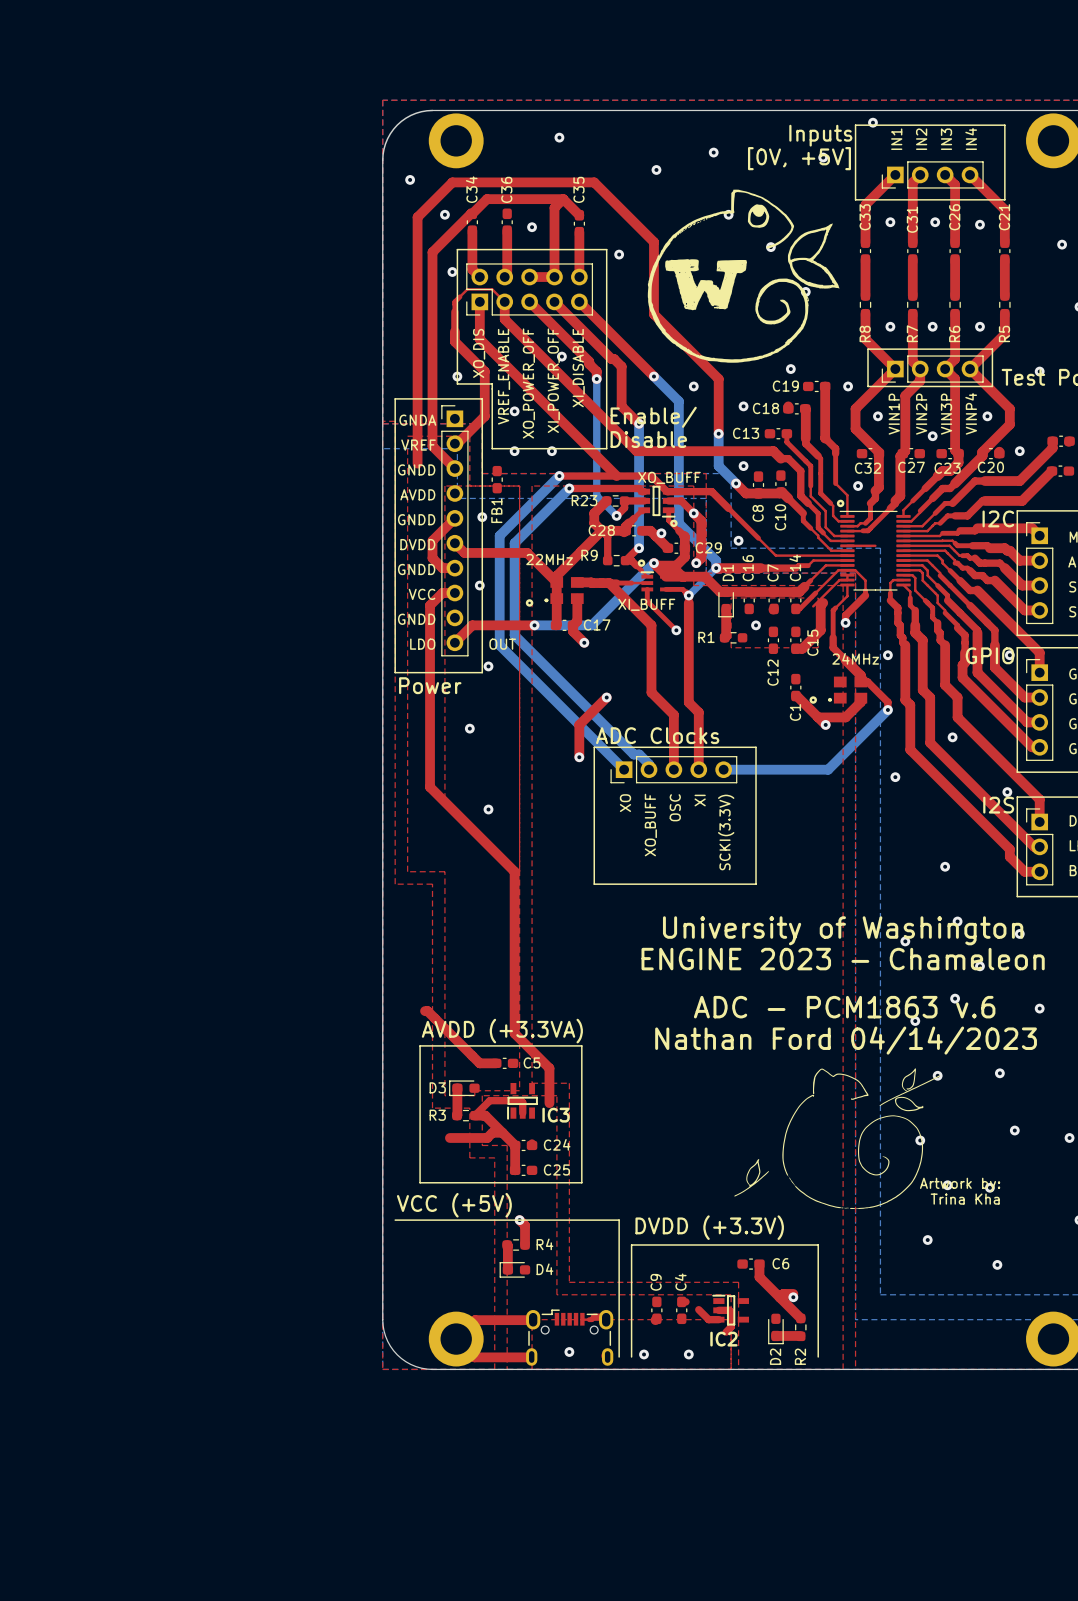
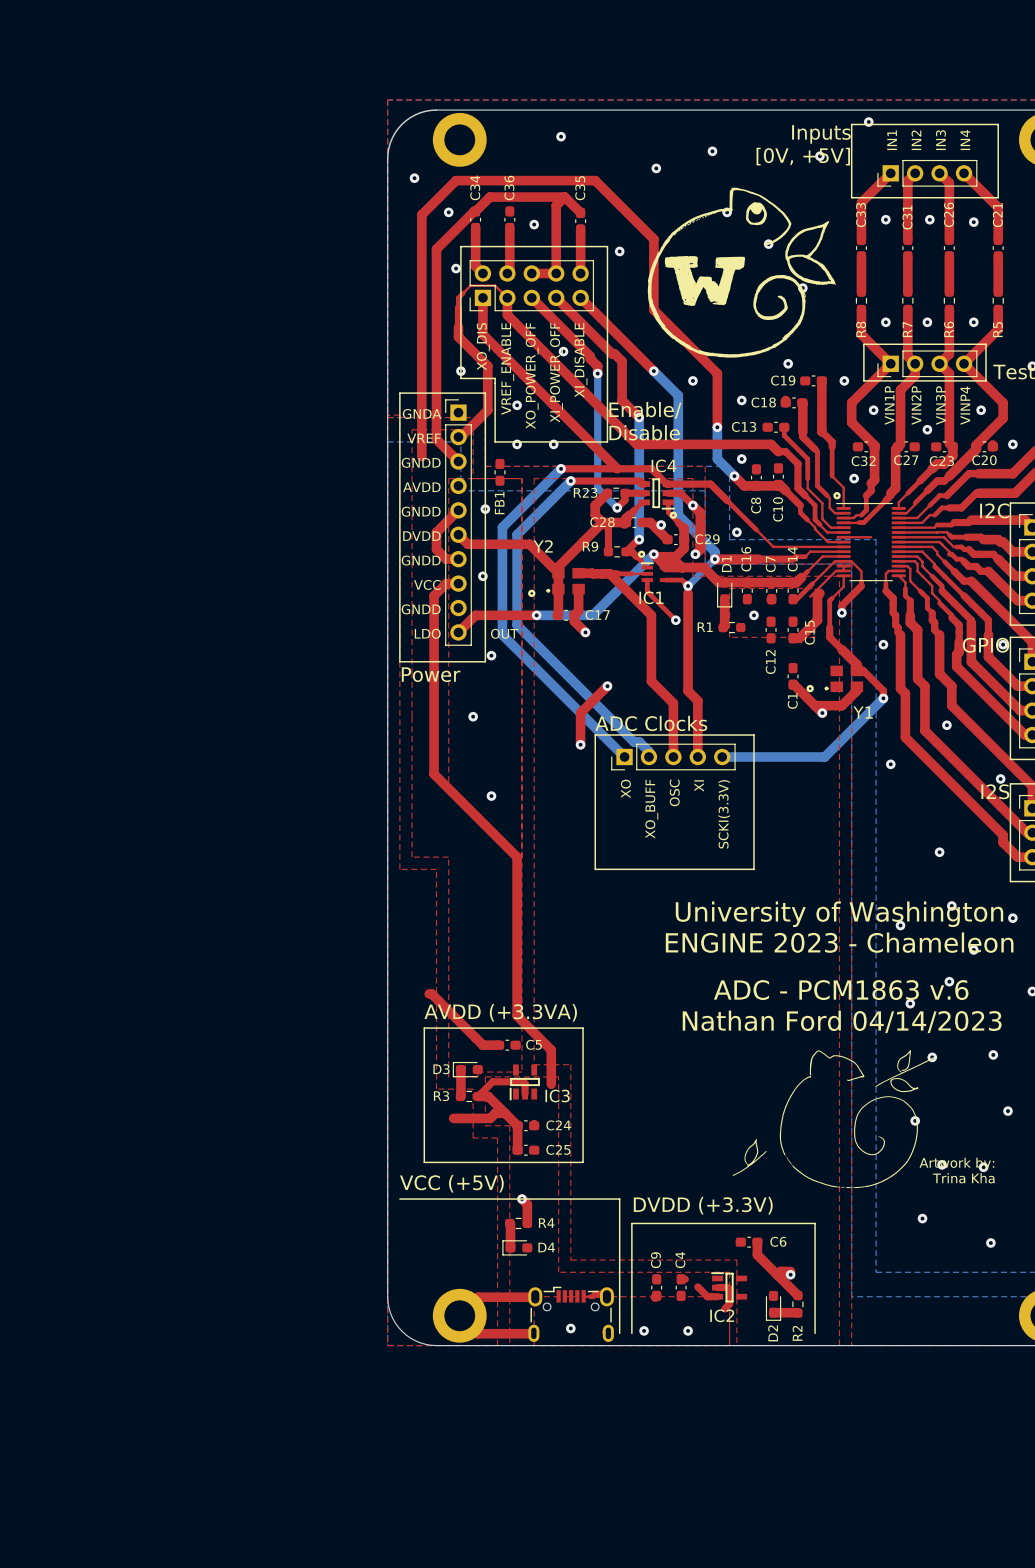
IC4 name: none -> IC4 (663, 465)
text: XO_BUFF (669, 477) -> none
Y2 name: none -> Y2 (543, 546)
text: 22MHz (549, 559) -> none
text: XI_BUFF (646, 604) -> none
IC1 name: none -> IC1 (651, 597)
text: 24MHz (855, 658) -> none
Y1 name: none -> Y1 (863, 712)

